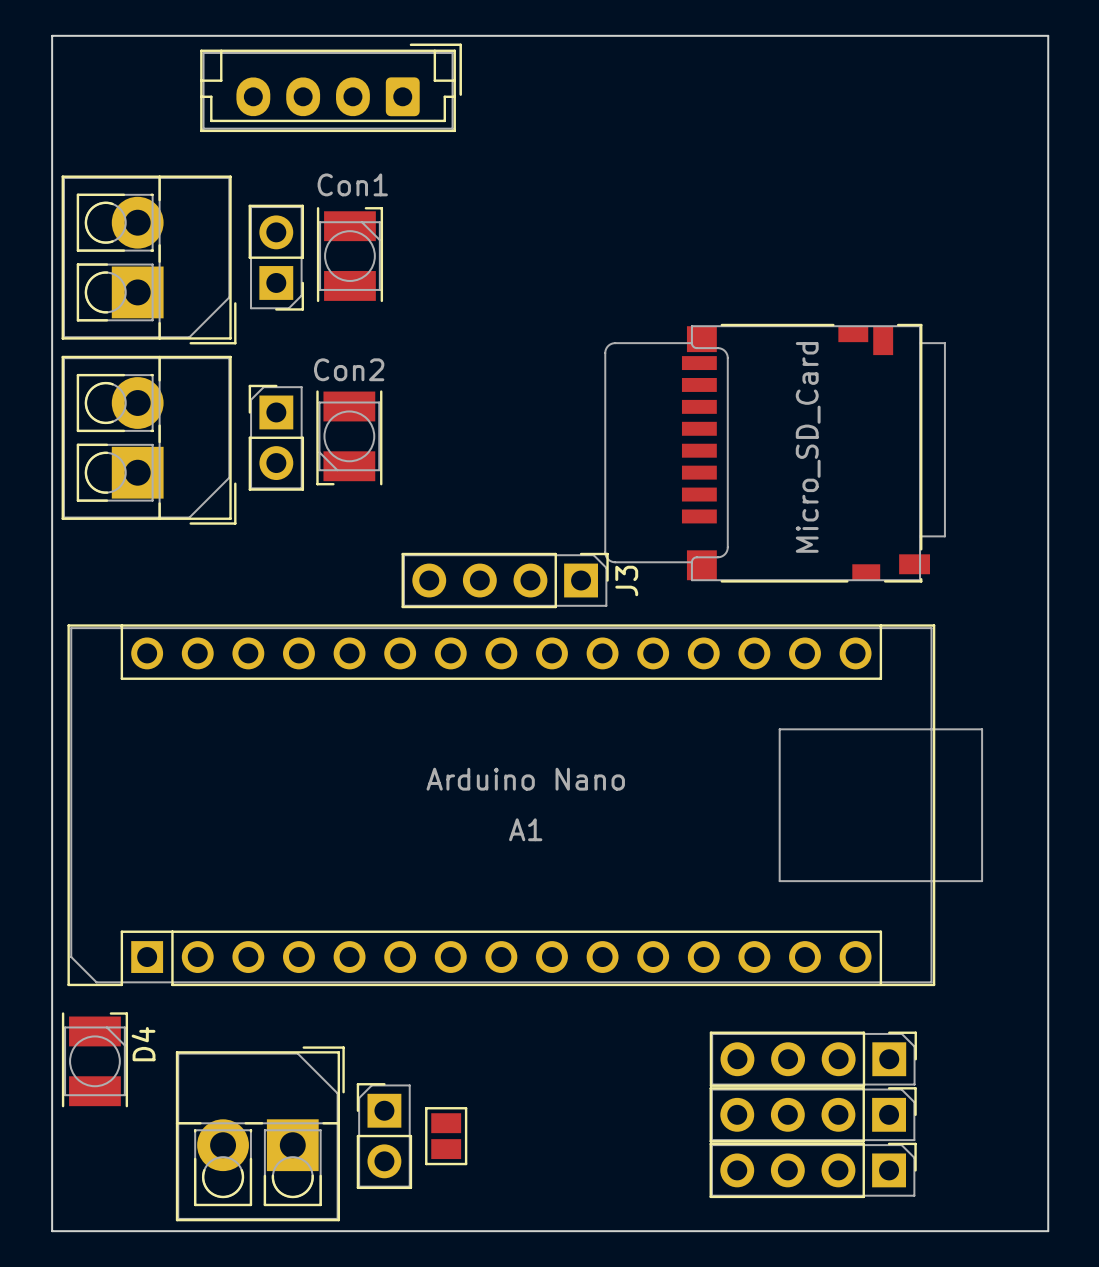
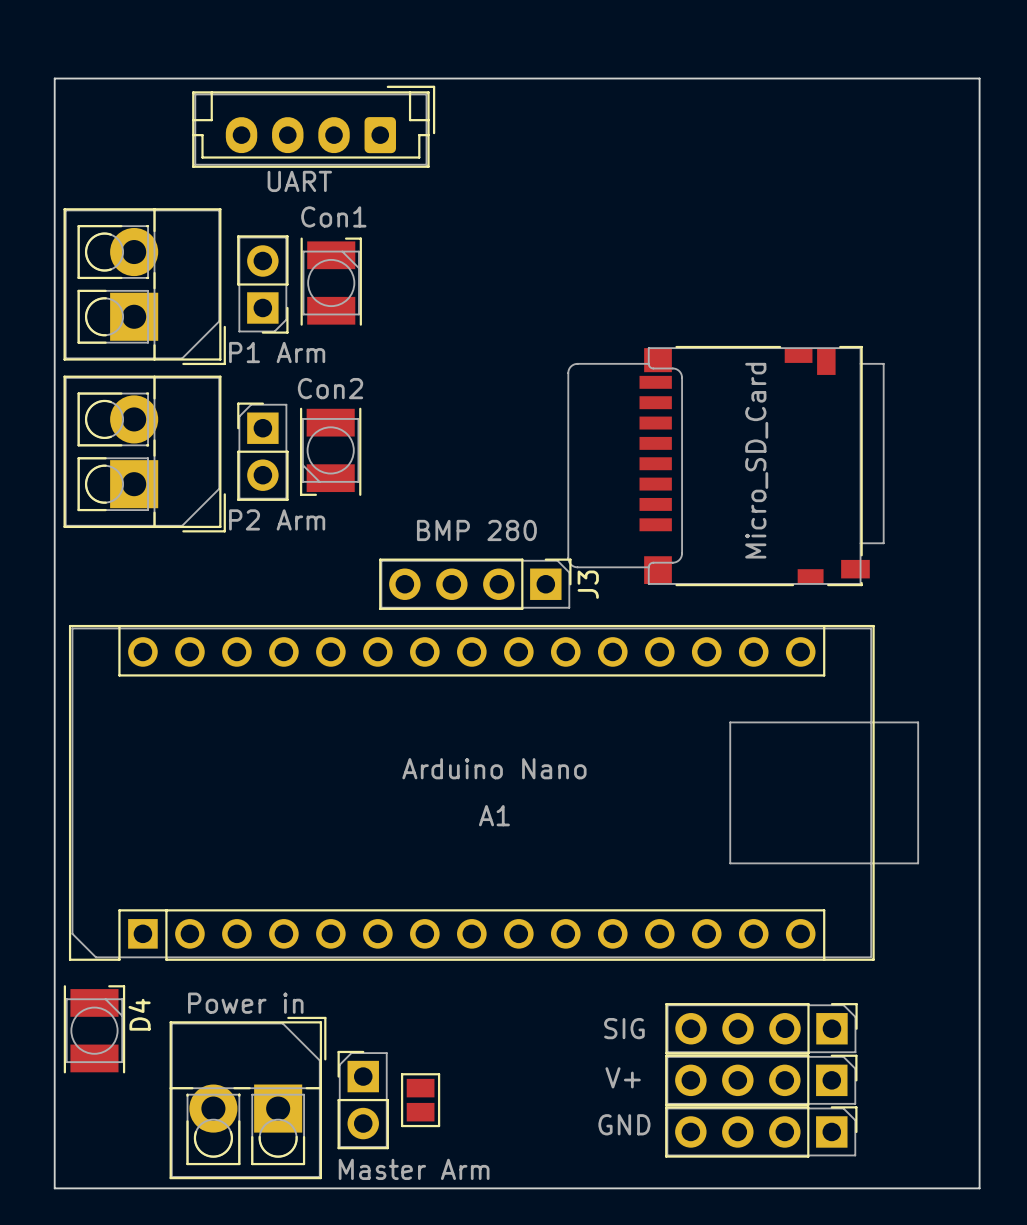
part value: none -> UART (299, 181)
part value: none -> P1 Arm (277, 352)
part value: none -> P2 Arm (277, 519)
J3 value: none -> BMP 280 (476, 530)
part value: none -> Power in (245, 1003)
part value: none -> SIG (624, 1028)
part value: none -> V+ (623, 1077)
part value: none -> GND (624, 1124)
part value: none -> Master Arm (414, 1169)

